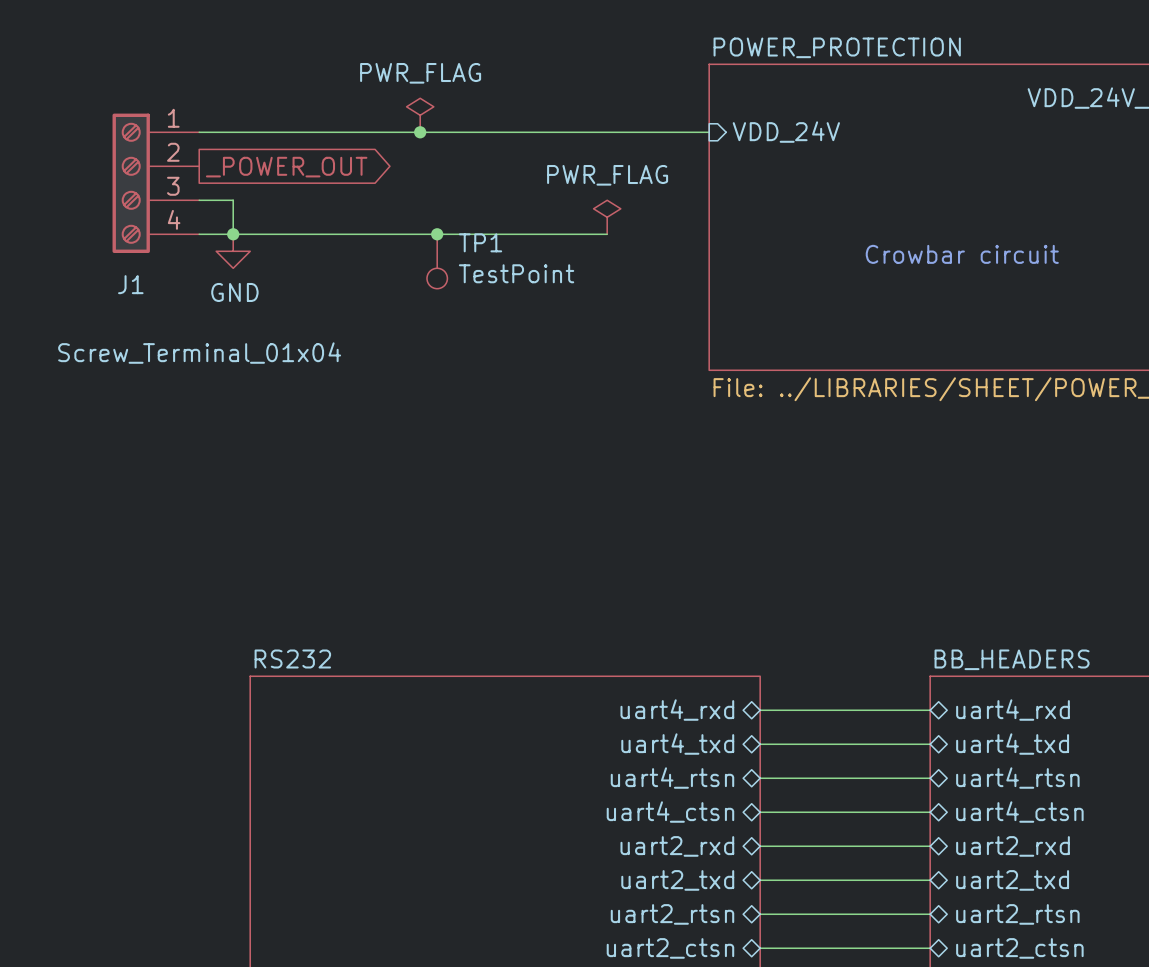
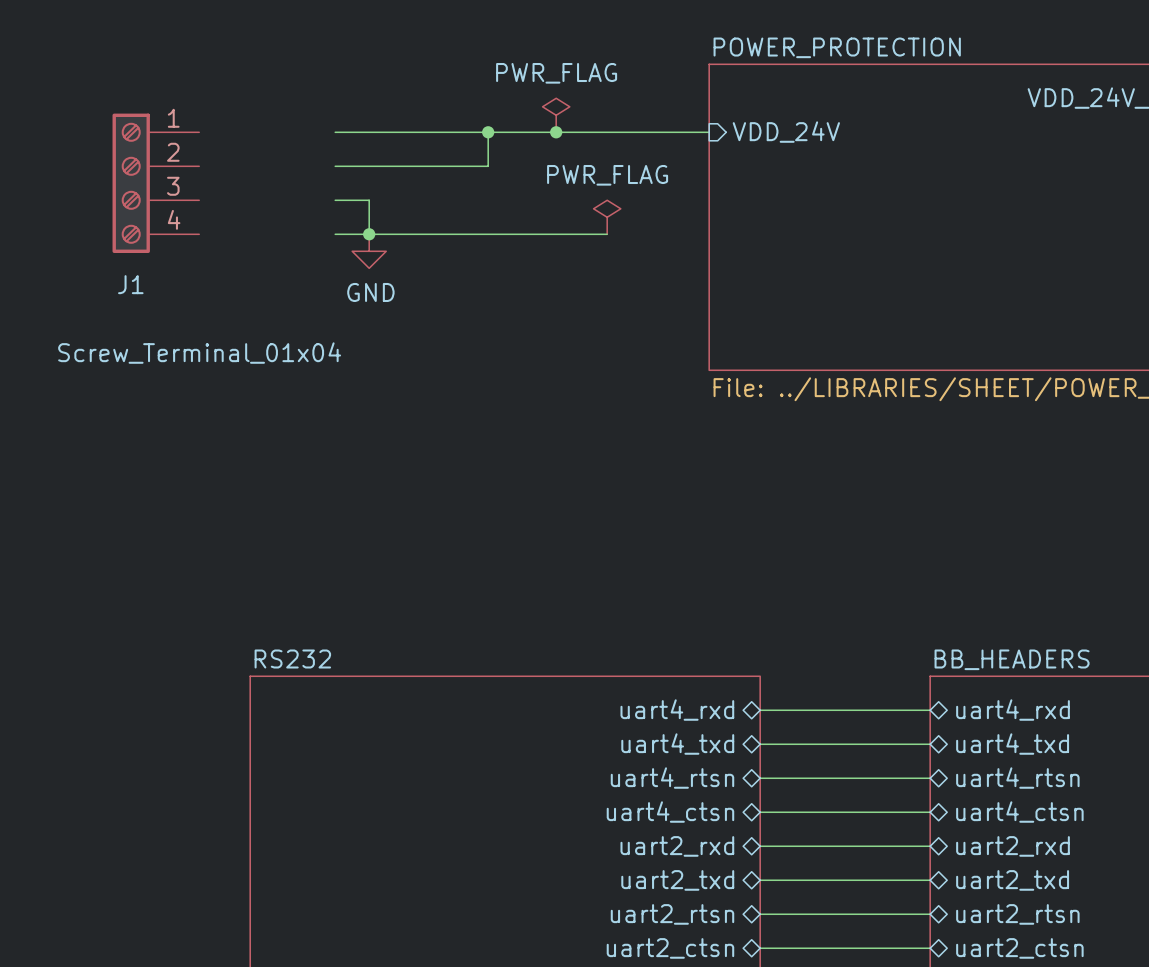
power symbol position: PWR_FLAG (420, 115) -> PWR_FLAG (556, 115)
wire: (199, 132) (335, 132) -> none
junction: (420, 132) -> none
wire: none -> (488, 132) (488, 166) (335, 166)
junction: none -> (488, 132)
junction: none -> (556, 132)
global label: _POWER_OUT (286, 167) -> none
wire: (199, 200) (233, 200) (233, 234) -> (335, 200) (369, 200) (369, 234)
wire: (199, 234) (335, 234) -> none
junction: (233, 234) -> none
junction: none -> (369, 234)
junction: (437, 234) -> none
power symbol position: GND (233, 251) -> GND (369, 251)
text: Crowbar circuit (962, 254) -> none
TP1: TestPoint (437, 261) -> none

